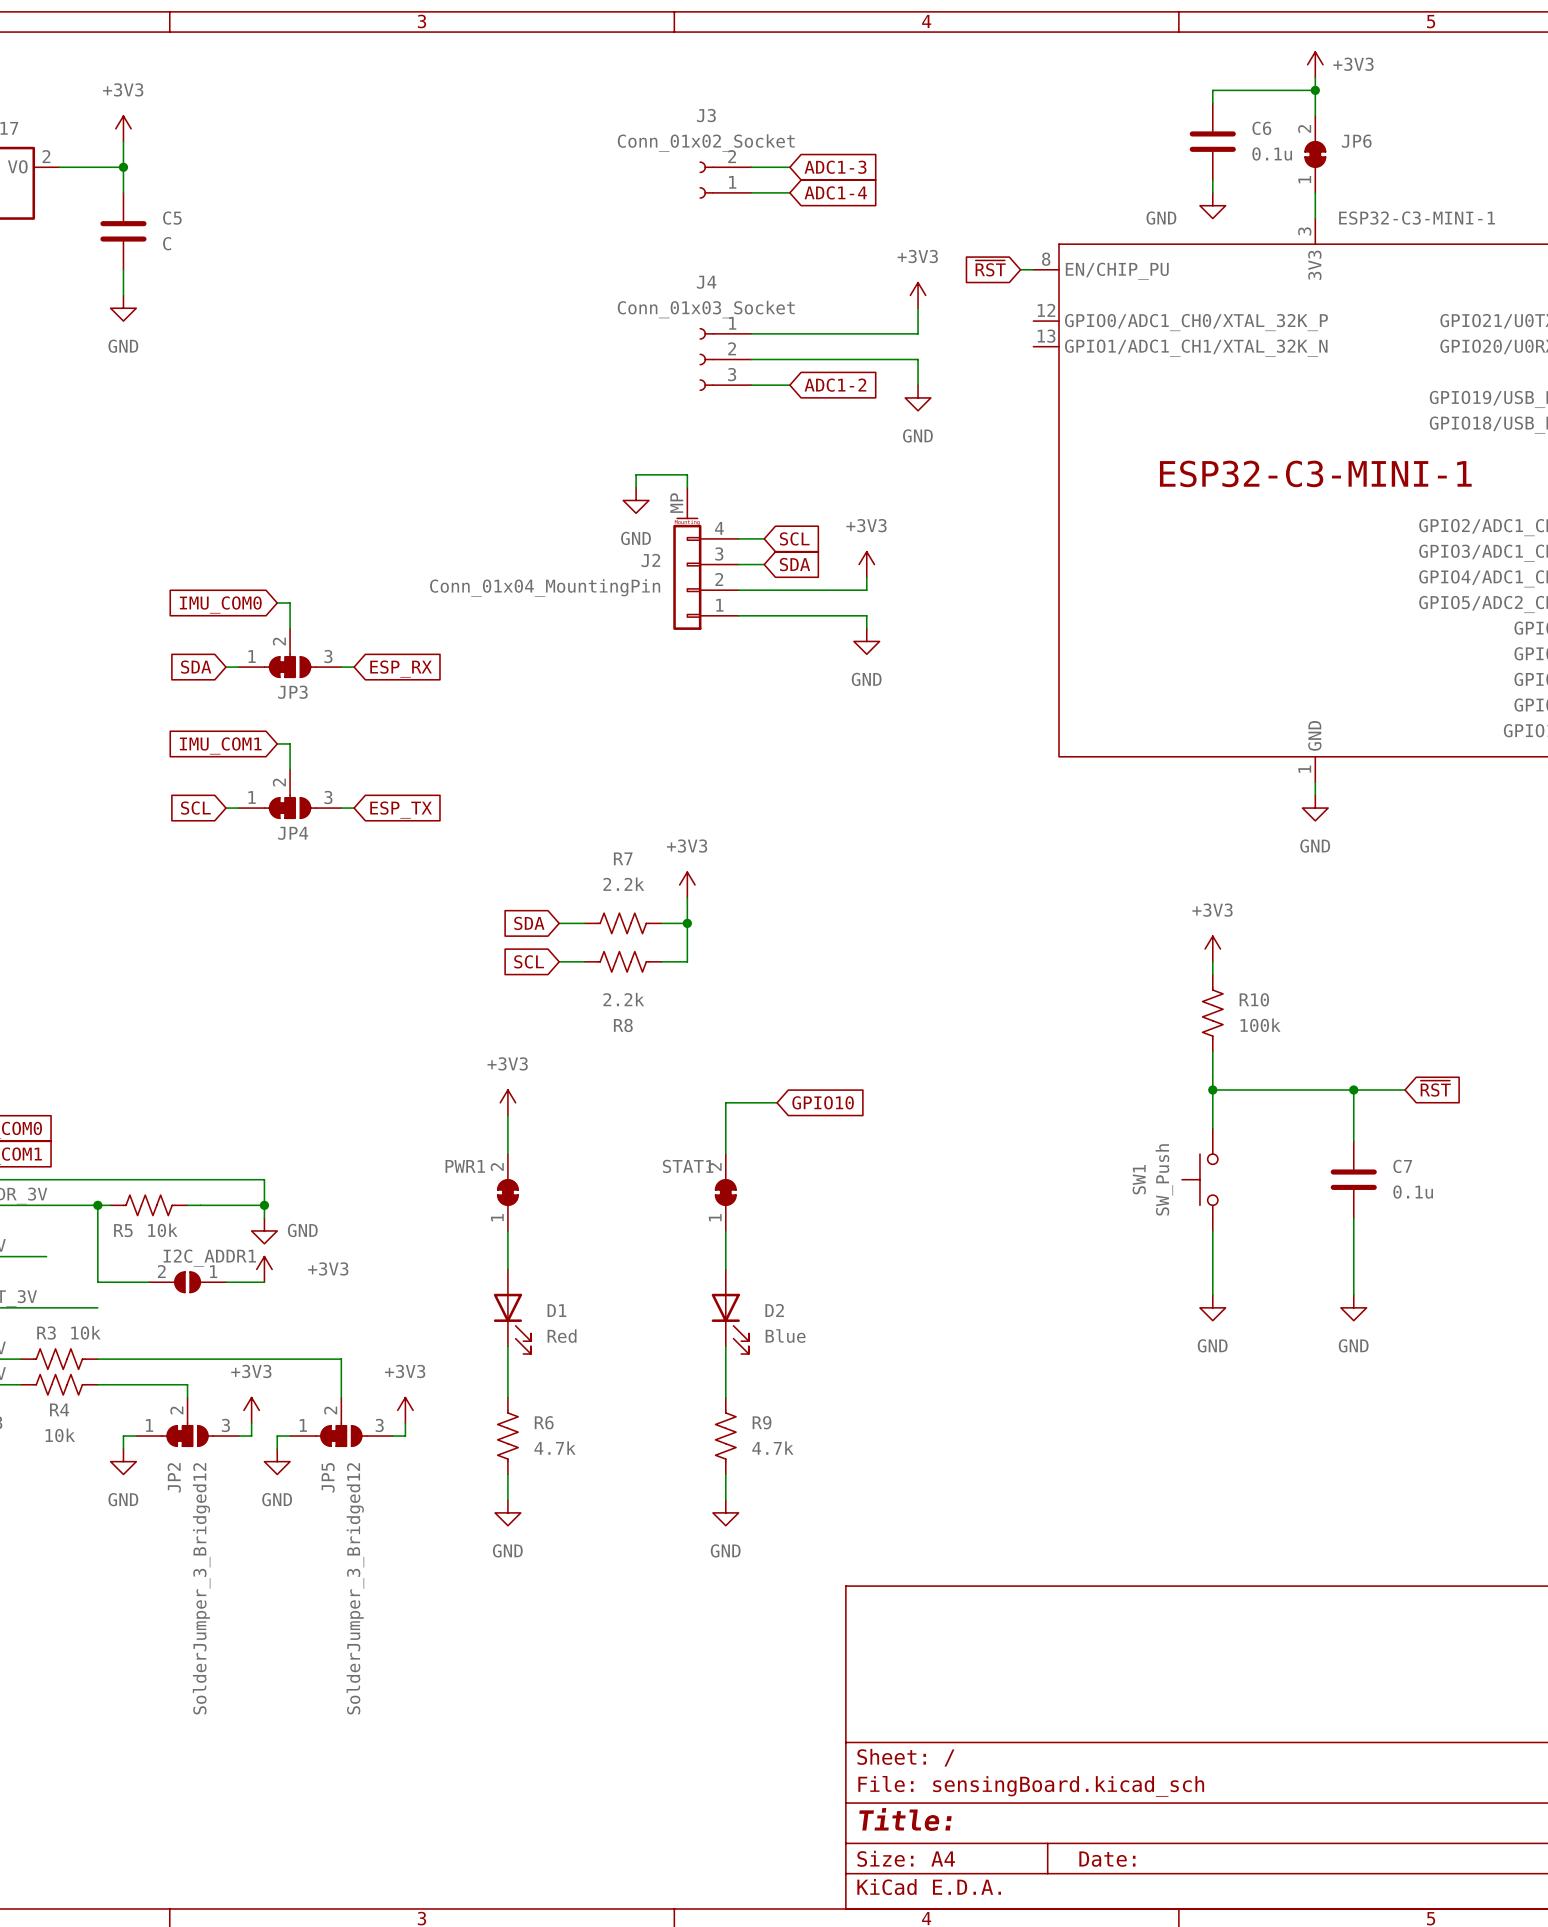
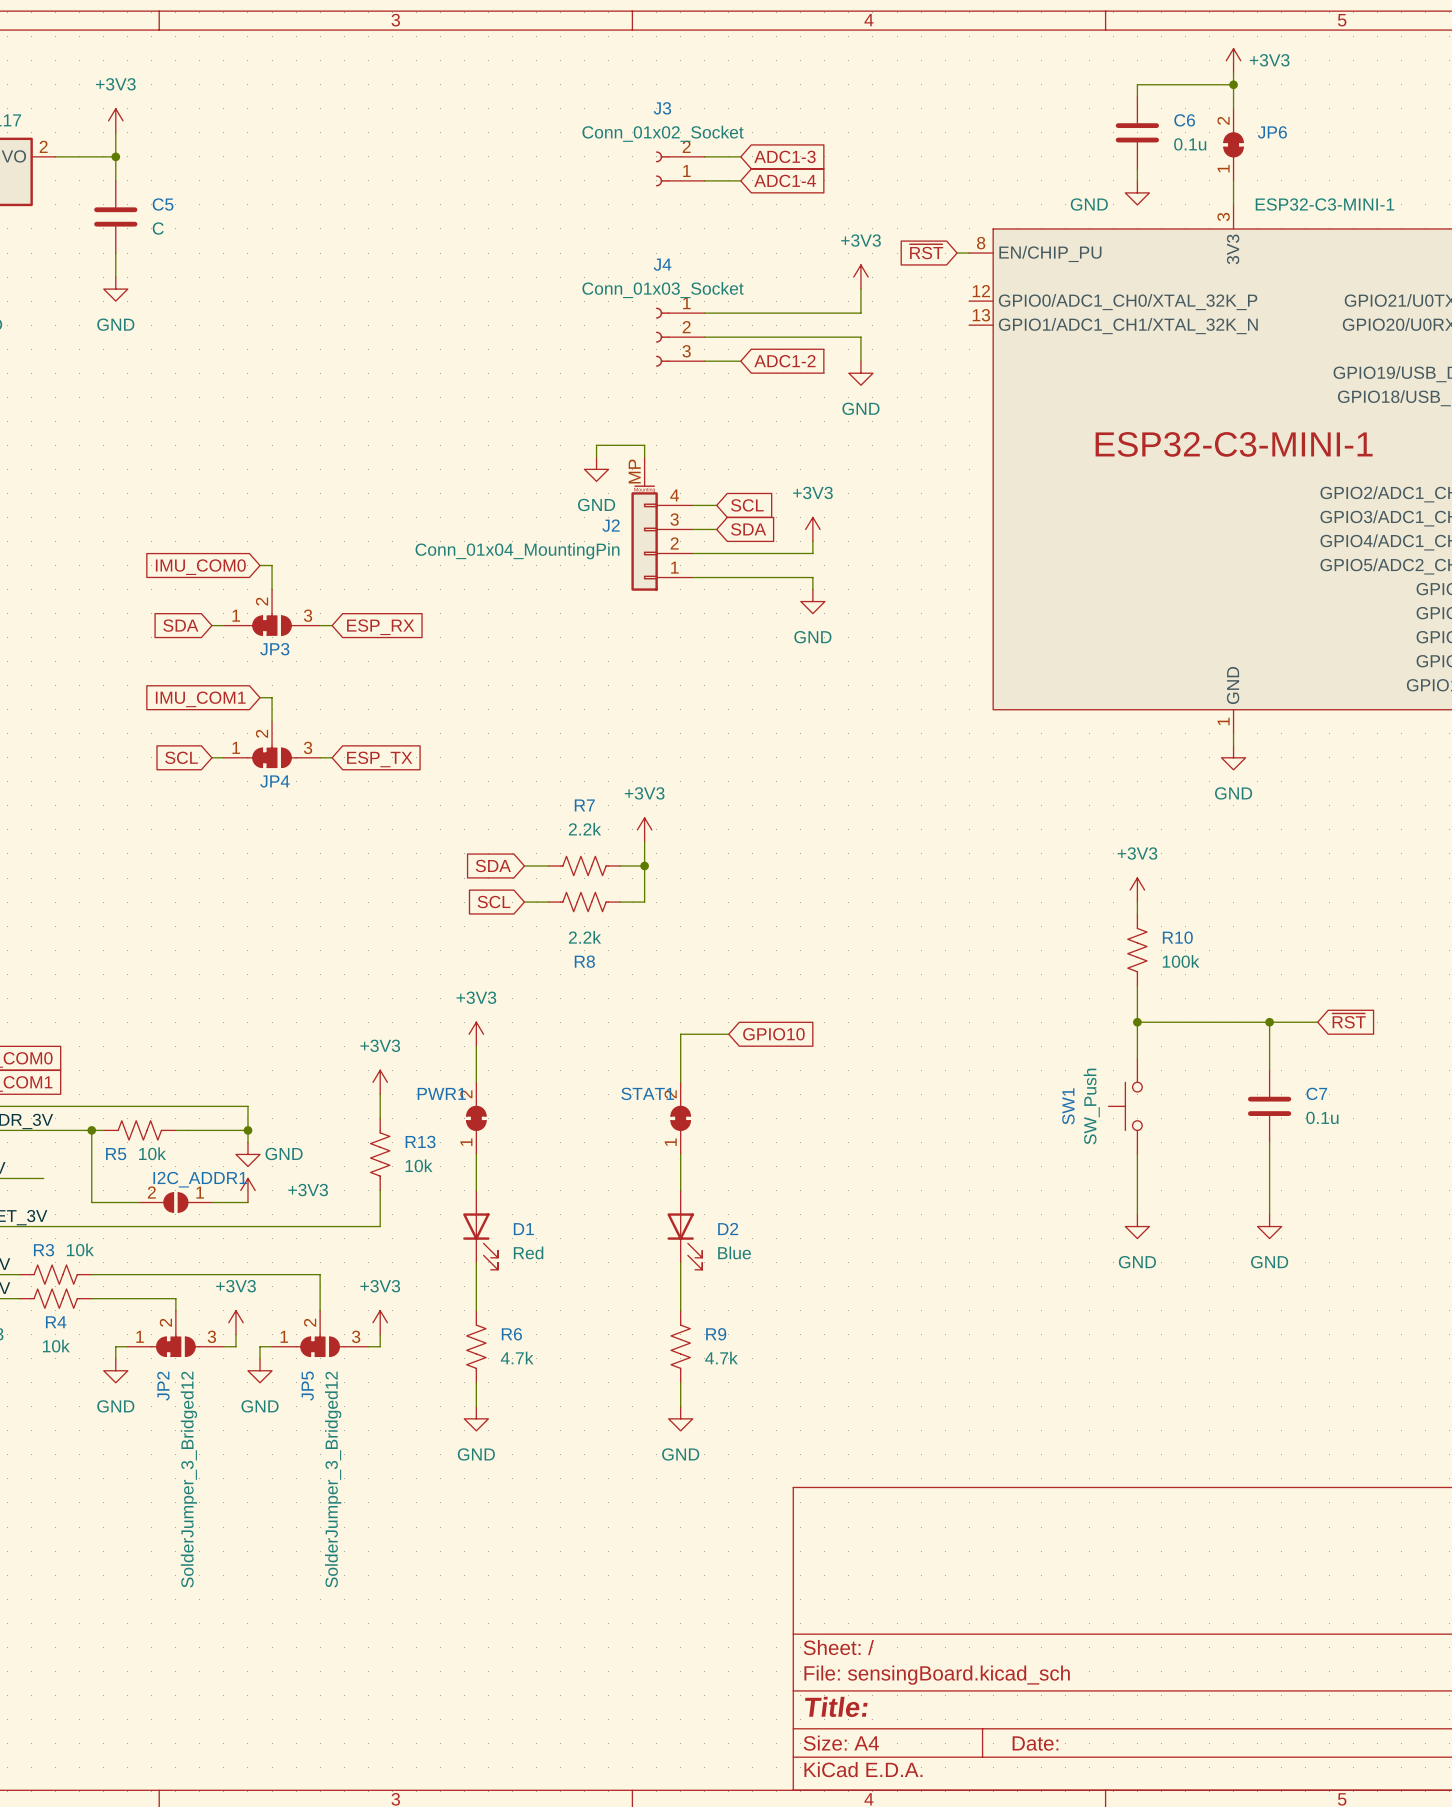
power symbol: none -> +3V3 (380, 1082)
wire: none -> (380, 1094) (380, 1118)
R13: none -> 10k (380, 1154)
wire: none -> (380, 1190) (380, 1226) (91, 1226)

